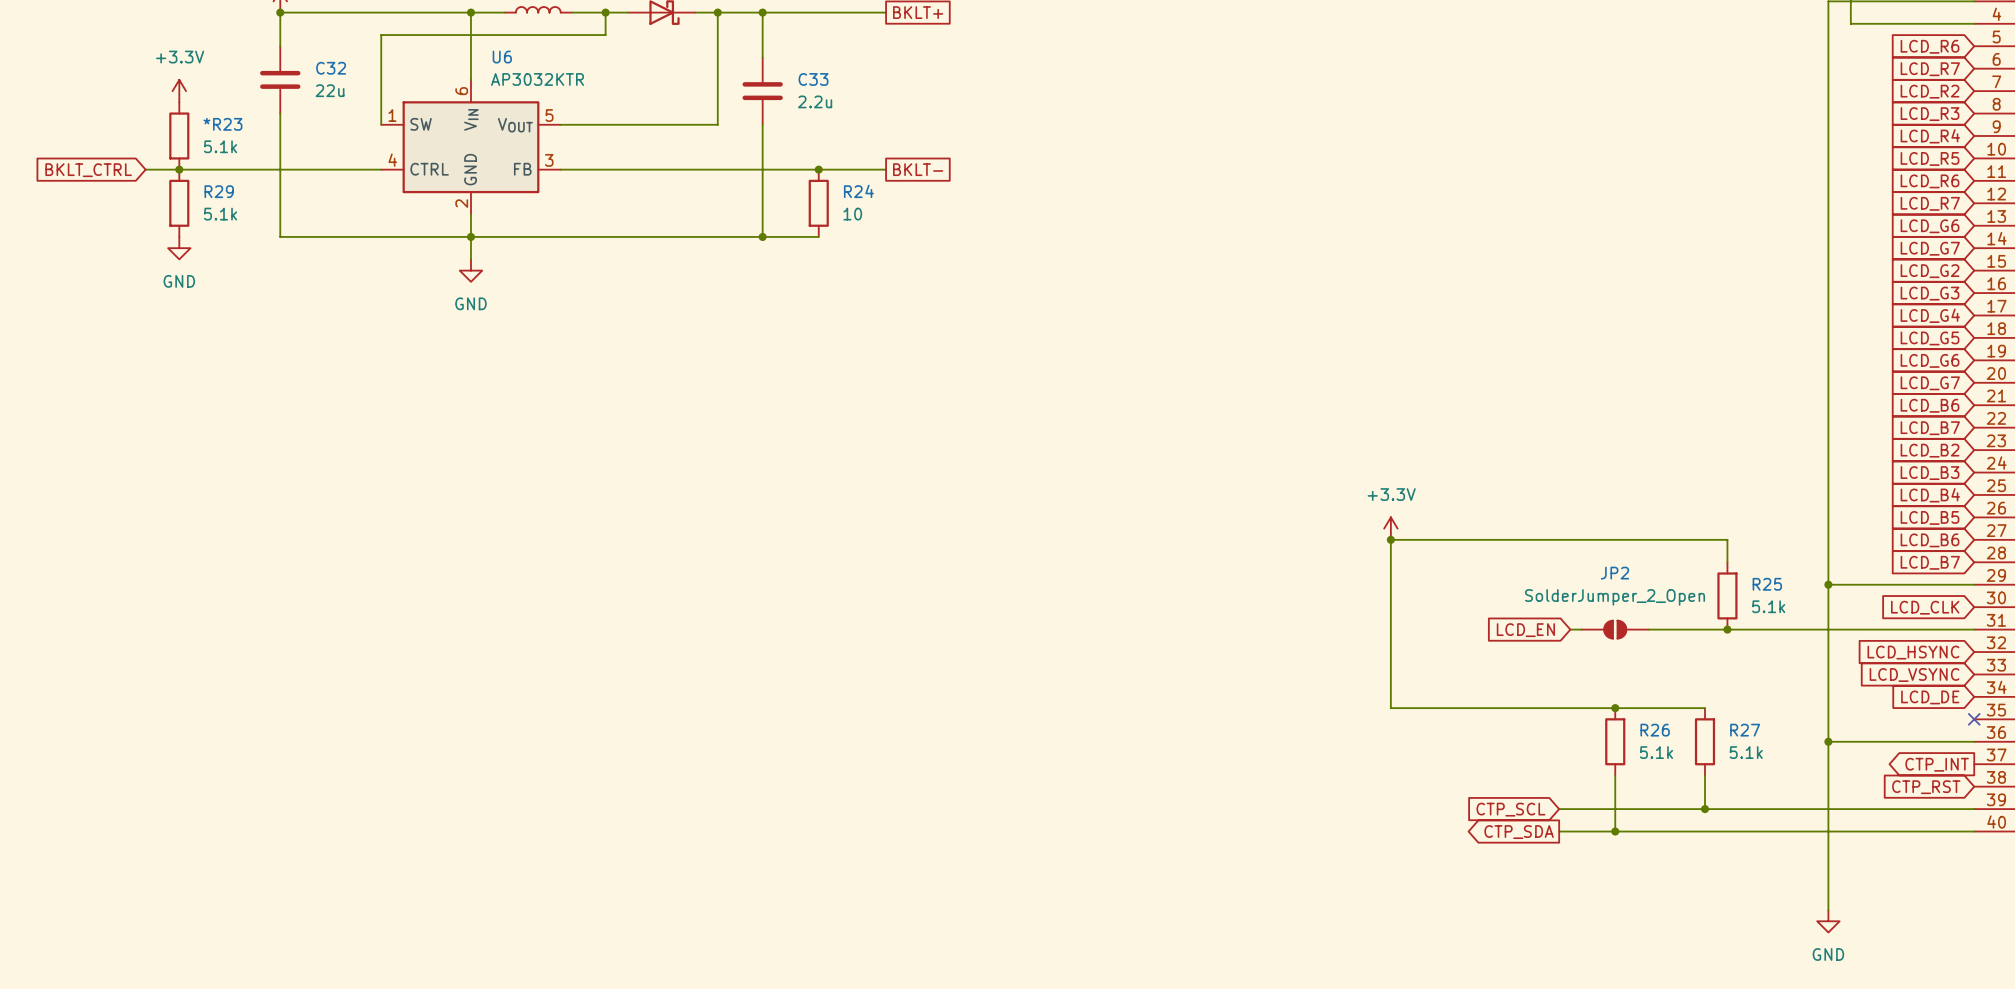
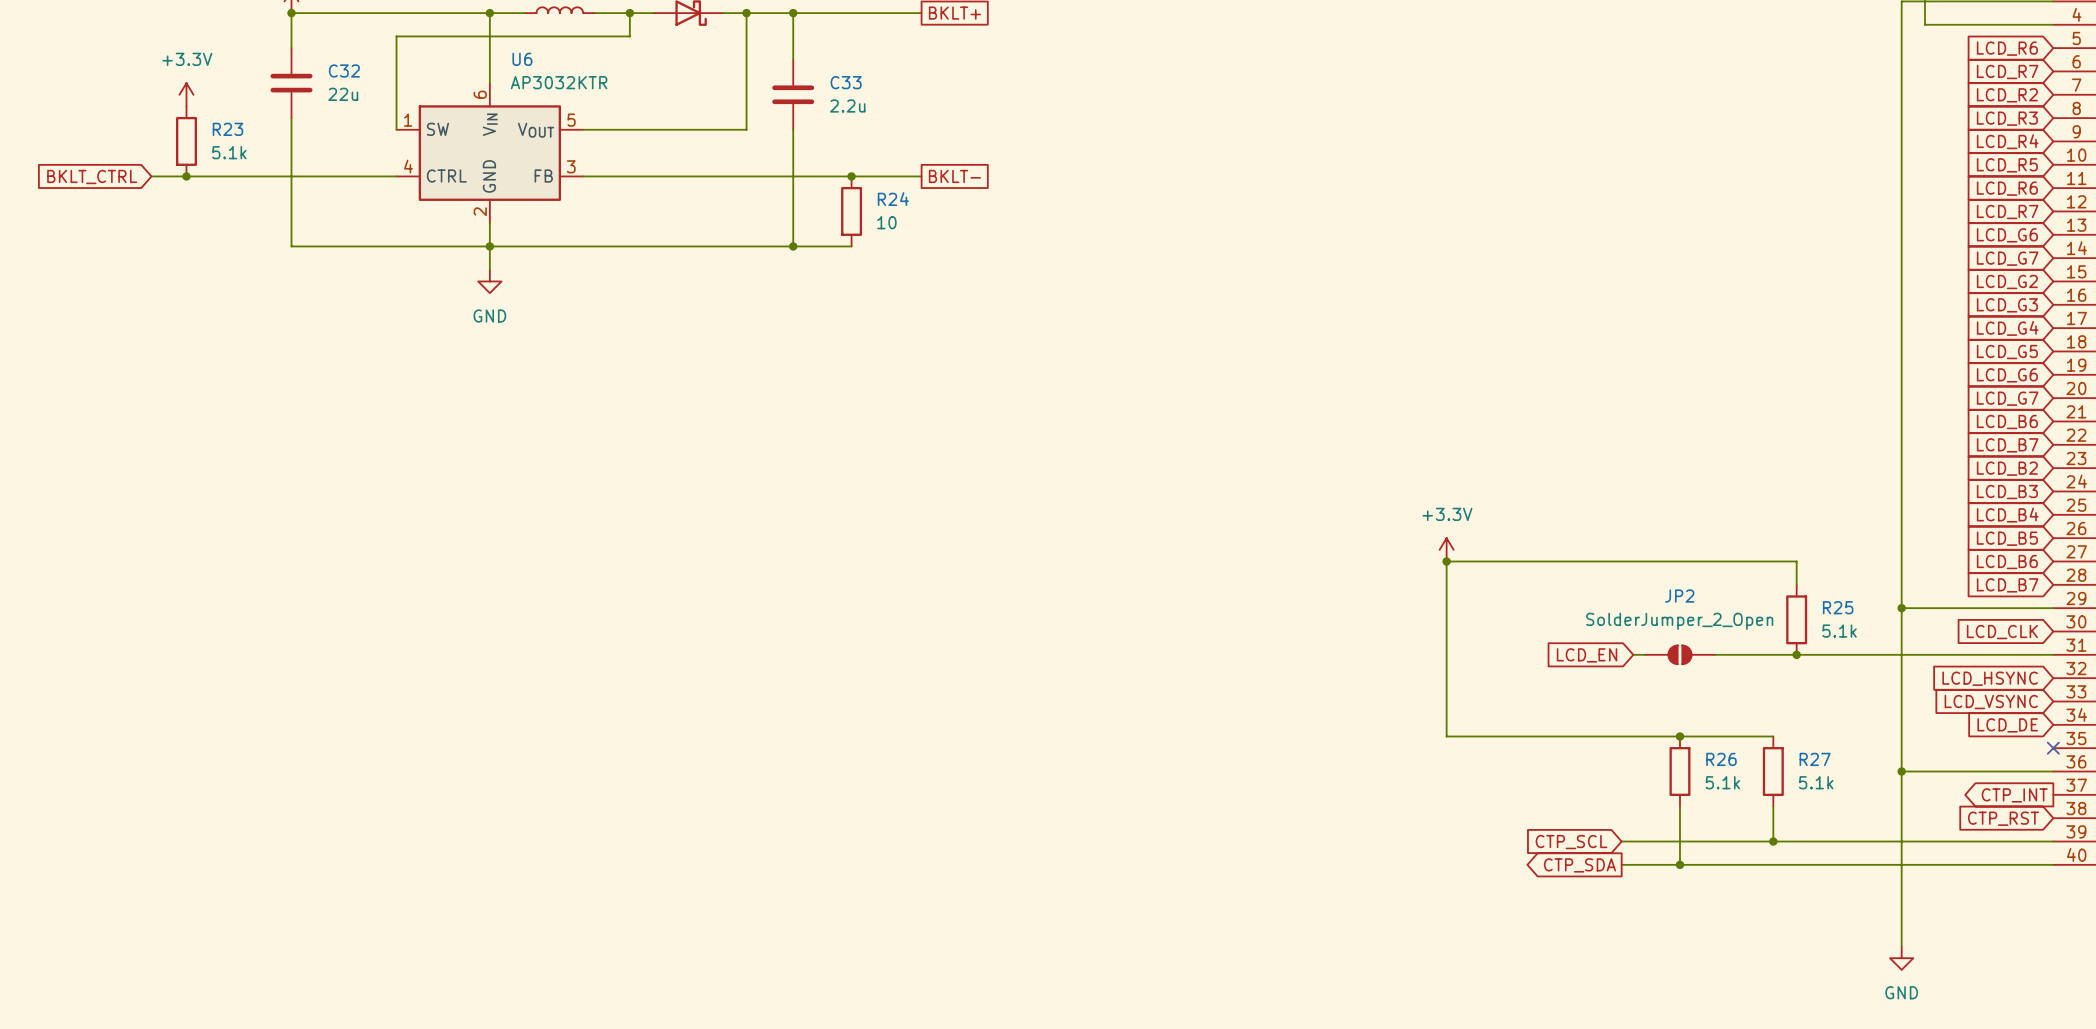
*R23 name: *R23 (222, 124) -> R23 (227, 129)
R29: 5.1k (179, 203) -> none
power symbol: GND (179, 248) -> none

